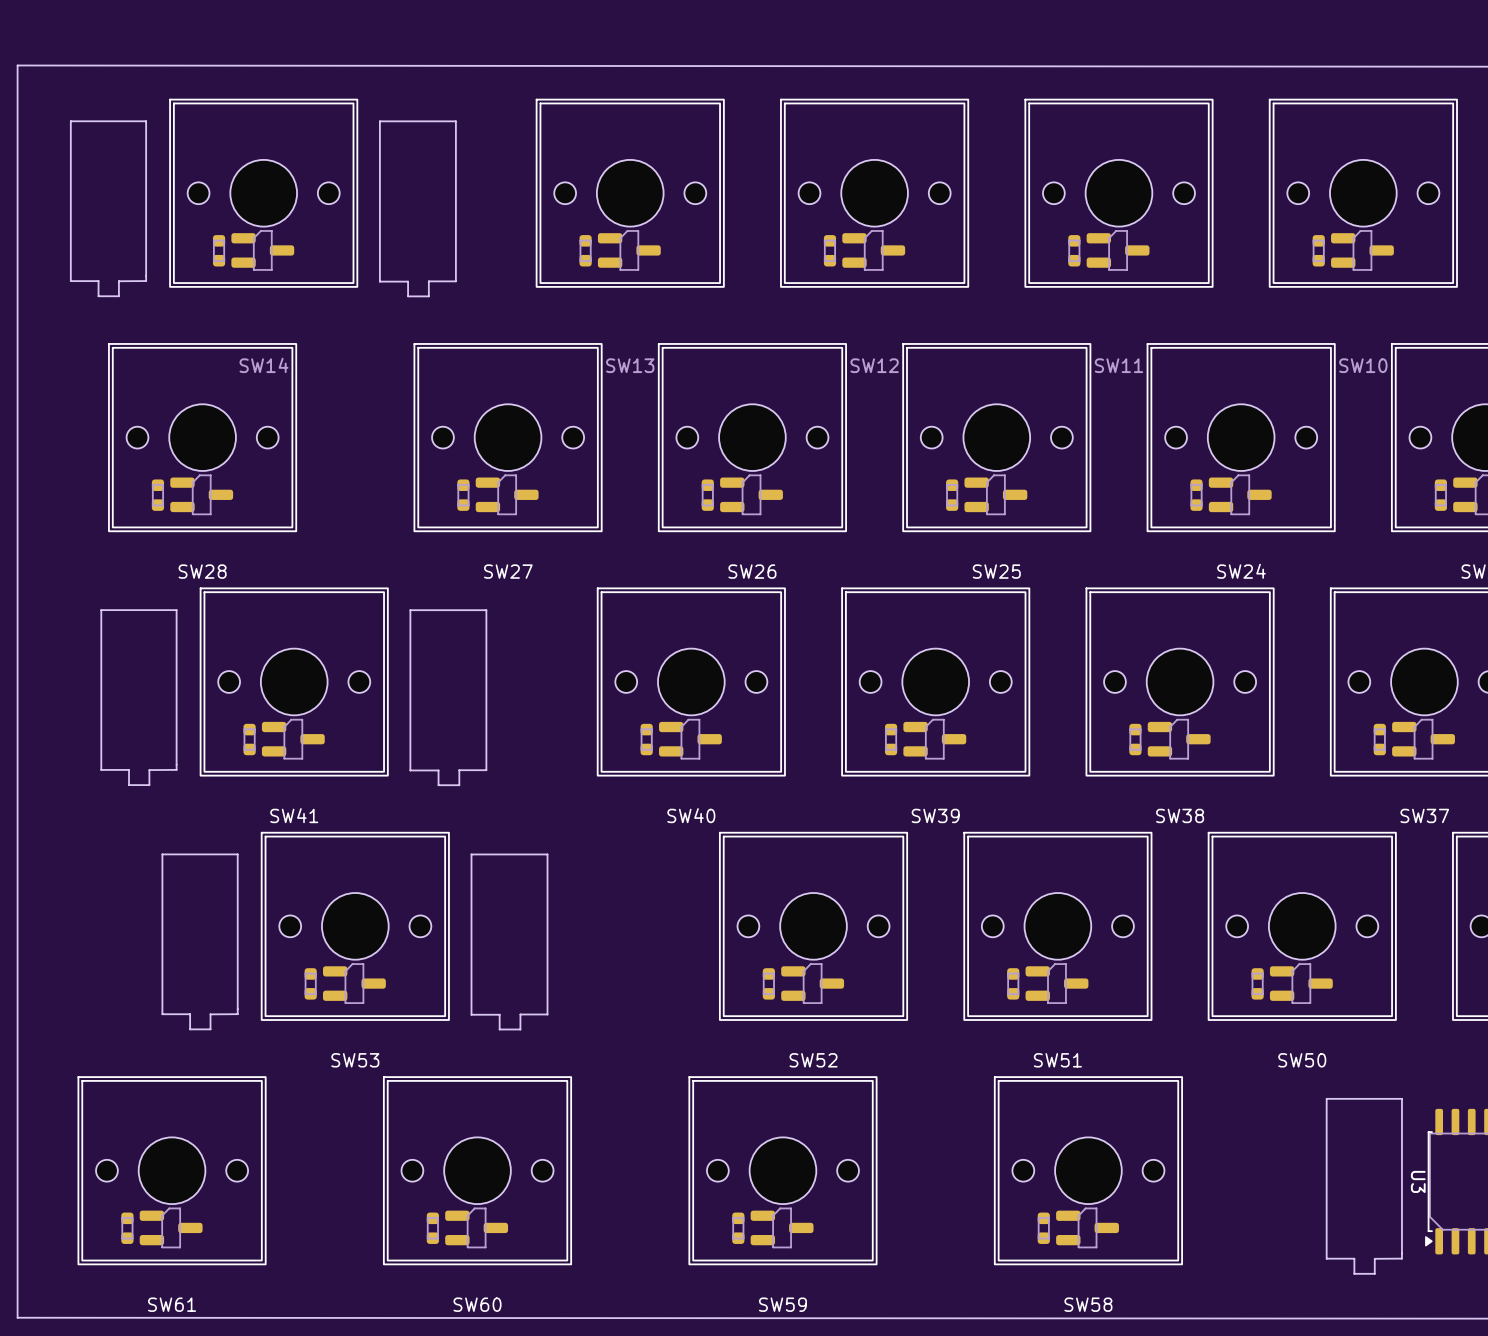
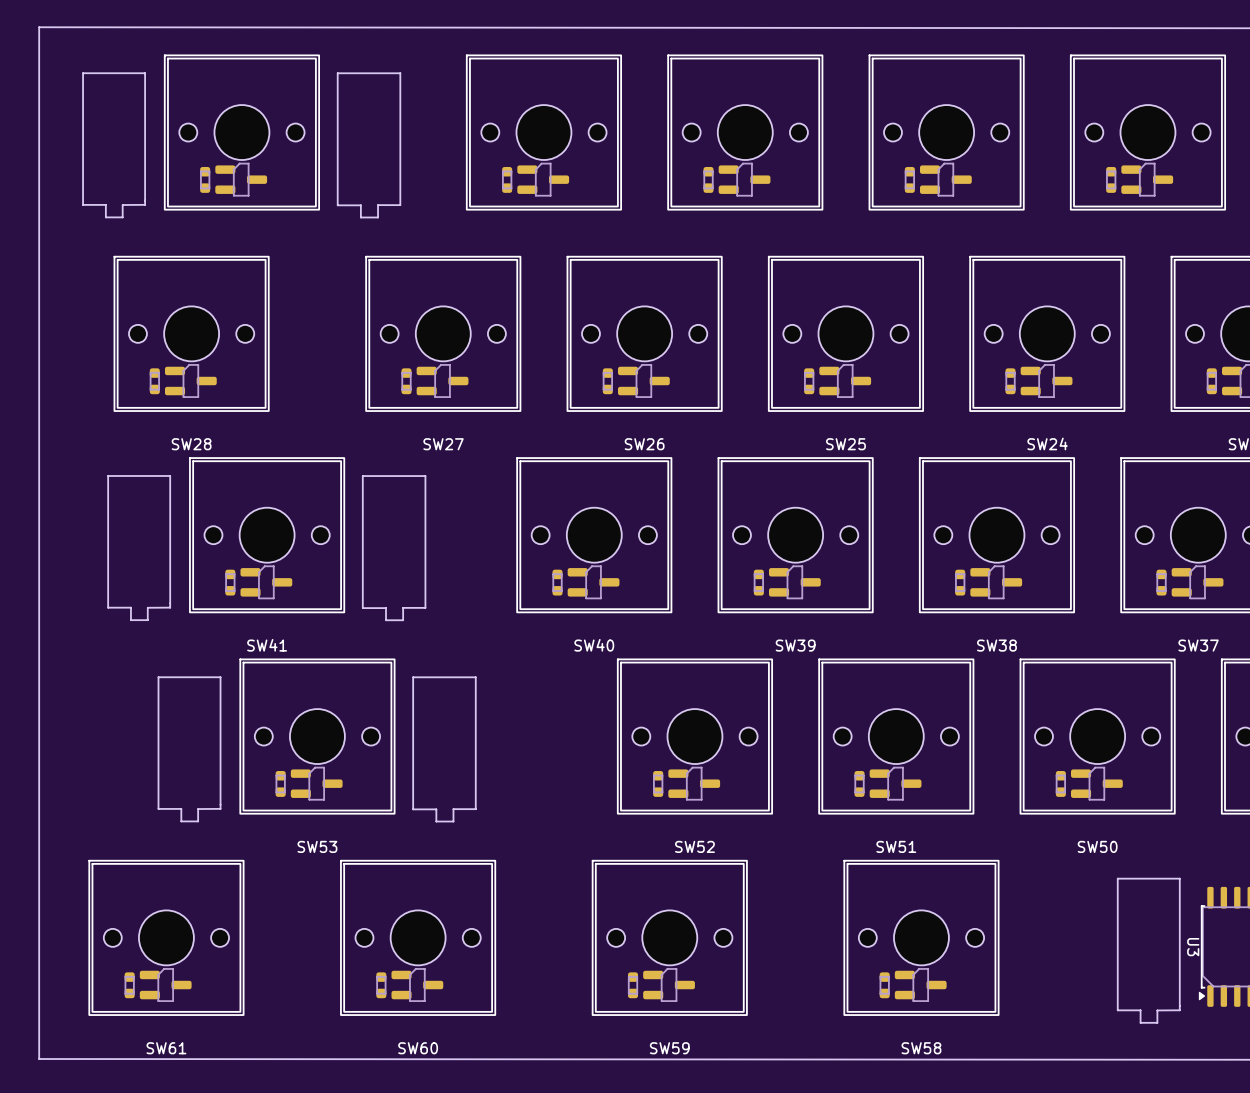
SW14 name: SW14 (263, 365) -> none
SW13 name: SW13 (630, 365) -> none
SW12 name: SW12 (874, 365) -> none
SW11 name: SW11 (1118, 365) -> none
SW10 name: SW10 (1363, 365) -> none

